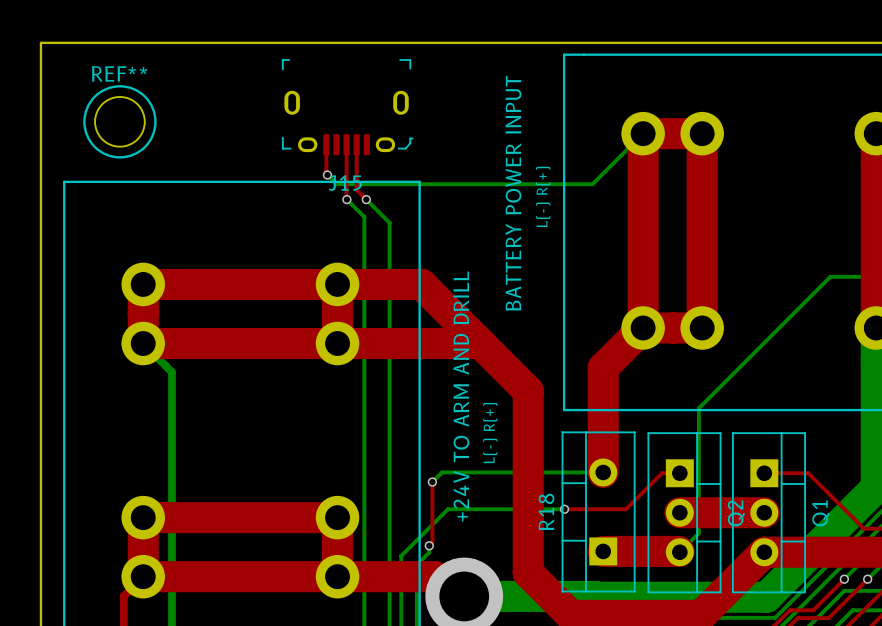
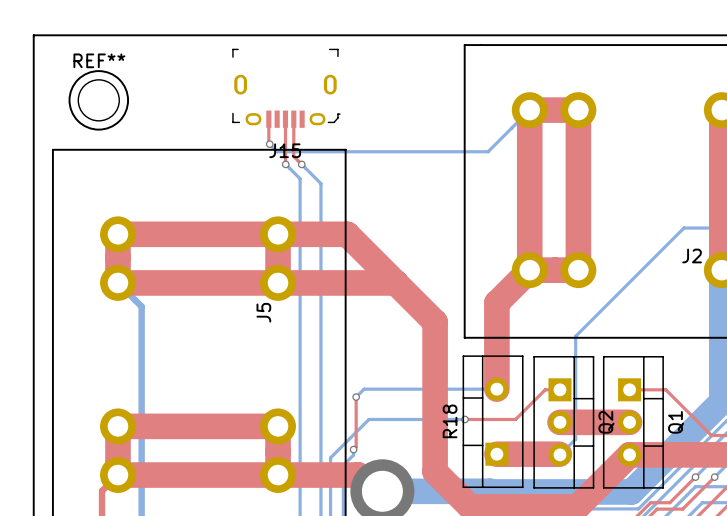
BATTERY POWER INPUT name: BATTERY POWER INPUT (513, 193) -> J2 (692, 255)
text: L(-) R(+) (543, 196) -> none
+24V TO ARM AND DRILL name: +24V TO ARM AND DRILL (461, 396) -> J5 (263, 312)
text: L(-) R(+) (490, 433) -> none

